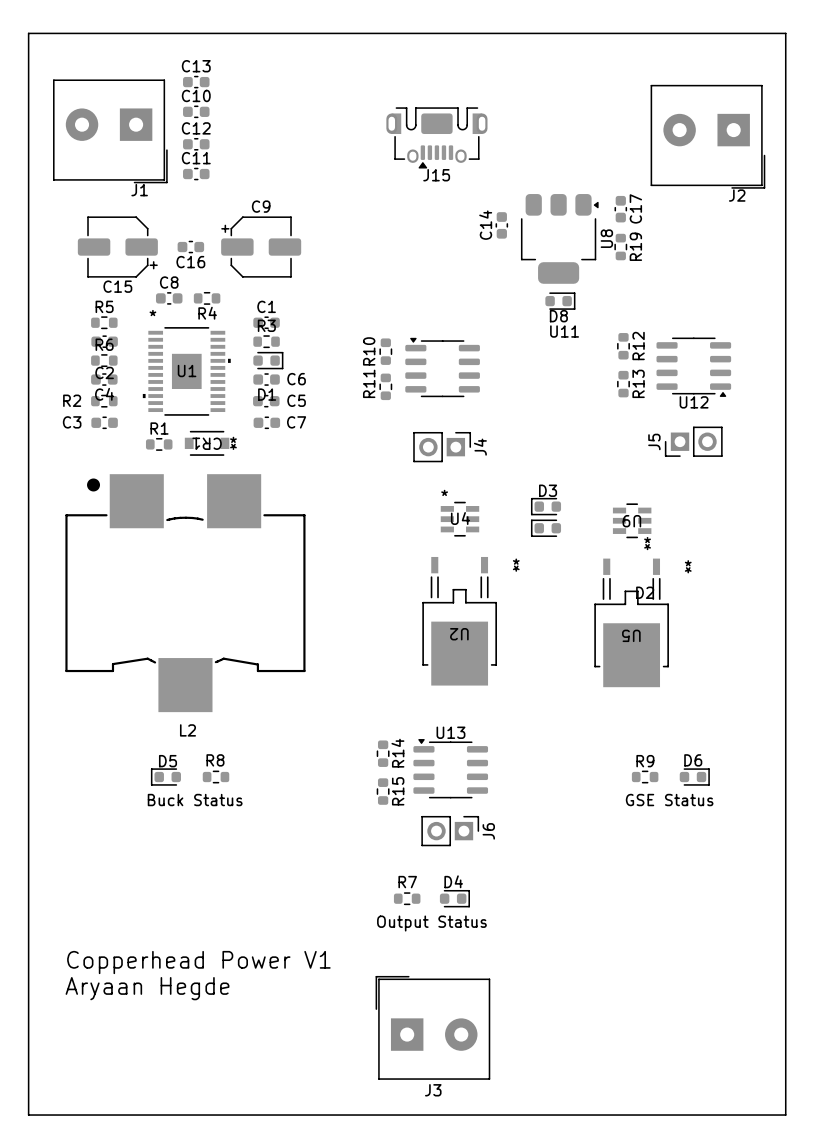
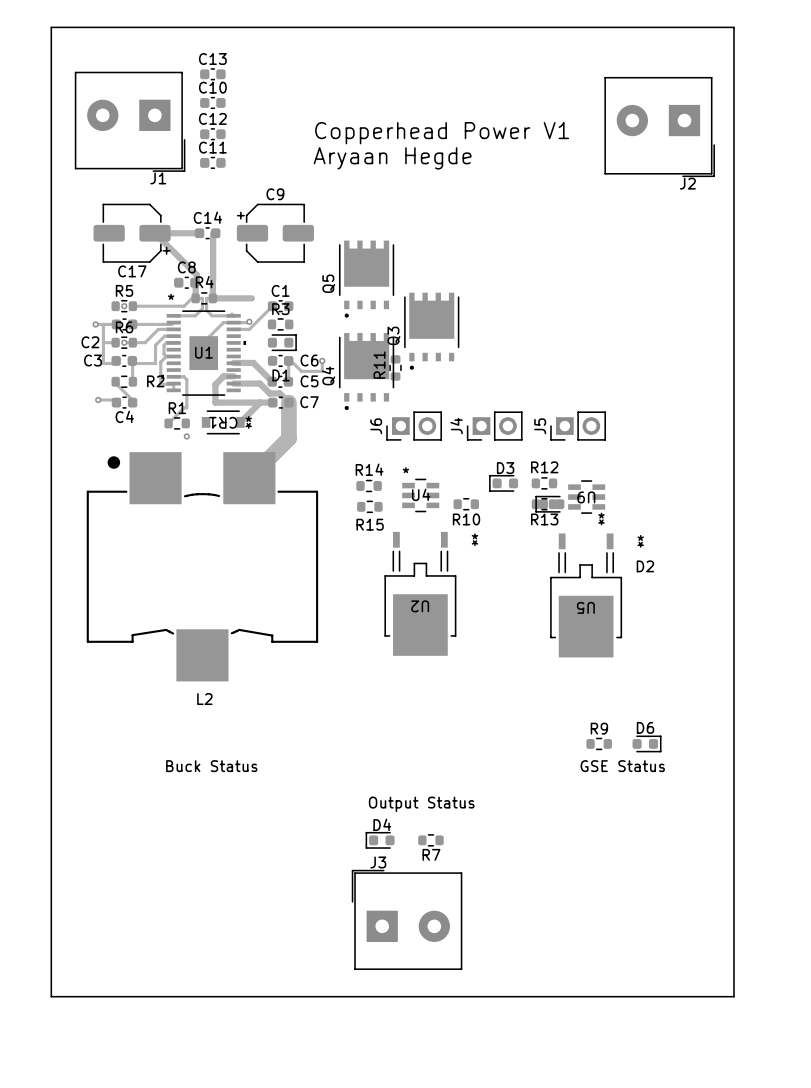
board edge: (737, 33) (785, 33) (785, 1115) (28, 1115) (28, 1039) -> (733, 27) (733, 996) (51, 996)
J2 position: (707, 136) -> (659, 127)
J15: (436, 138) -> none
text: none -> Copperhead Power V1 (442, 133)
text: none -> Aryaan Hegde (392, 158)
C17 footprint: [614, 195, 627, 223] -> [93, 203, 171, 263]
C17 name position: C17 (635, 208) -> C17 (132, 271)
C14: (501, 225) -> none
U8: (559, 238) -> none
C15: (117, 247) -> none
track: none -> (196, 233) (155, 233) (196, 275) (195, 298)
track: none -> (213, 233) (212, 298)
R19: (620, 247) -> none
C16 name: C16 (190, 262) -> C14 (207, 217)
Q5: none -> (366, 279)
R4 position: (207, 298) -> (204, 298)
D8: (560, 301) -> none
R4 name position: R4 (207, 313) -> R4 (204, 282)
track: none -> (212, 298) (206, 298) (206, 310) (212, 315) (233, 315) (231, 314)
track: none -> (212, 298) (251, 298)
via: none -> (124, 306)
track: none -> (132, 306) (184, 306) (192, 298) (202, 298) (202, 308) (195, 315) (173, 315)
track: none -> (272, 306) (249, 329) (233, 329)
track: none -> (249, 321) (223, 322) (203, 342) (203, 353)
via: none -> (249, 321)
track: none -> (173, 322) (171, 324) (132, 324)
track: none -> (95, 324) (116, 324)
via: none -> (95, 324)
track: none -> (103, 324) (103, 363) (116, 363)
track: none -> (173, 329) (158, 329) (145, 342) (124, 342)
R12 rotation: 0° (623, 346) -> 90° clockwise (544, 483)
R12 position: (623, 346) -> (544, 483)
R12 name position: R12 (638, 346) -> R12 (544, 467)
Q3: none -> (431, 331)
R10 name position: R10 (369, 351) -> R10 (466, 519)
R10 rotation: 0° (385, 351) -> 90° clockwise (466, 504)
R10 position: (385, 351) -> (466, 504)
track: none -> (173, 336) (164, 336) (155, 345) (155, 363) (132, 363) (132, 381)
track: none -> (103, 342) (115, 342)
via: none -> (124, 342)
track: none -> (173, 342) (166, 342) (164, 345) (164, 354) (166, 356)
U11: (442, 367) -> none
U12: (693, 367) -> none
C2 name position: C2 (104, 372) -> C2 (90, 342)
track: none -> (166, 356) (160, 362) (160, 384) (173, 383) (173, 390)
track: none -> (322, 360) (322, 371) (301, 371) (288, 360) (288, 381)
via: none -> (322, 360)
track: none -> (233, 362) (253, 362) (272, 381)
R13 rotation: 0° (623, 384) -> 90° clockwise (544, 504)
R13 position: (623, 384) -> (544, 504)
Q4: none -> (366, 371)
C4 name: C4 (104, 394) -> C3 (93, 360)
track: none -> (233, 376) (223, 376) (215, 384) (215, 402) (272, 402)
track: none -> (173, 376) (183, 376) (186, 379) (186, 407) (184, 407) (168, 423)
R2 name position: R2 (72, 400) -> R2 (155, 381)
track: none -> (115, 381) (132, 400)
track: none -> (233, 383) (259, 383) (269, 393) (279, 393) (288, 402) (288, 438) (249, 478)
track: none -> (98, 400) (116, 400)
via: none -> (98, 400)
C3 name: C3 (72, 422) -> C4 (124, 416)
track: none -> (260, 402) (240, 422)
J5 position: (693, 441) -> (578, 426)
J4 rotation: 0° (442, 447) -> 180° (494, 426)
J4 position: (442, 447) -> (494, 426)
via: none -> (186, 436)
D3 position: (546, 506) -> (503, 483)
U4 position: (459, 519) -> (420, 495)
U9 position: (632, 520) -> (586, 497)
U2 position: (459, 621) -> (420, 593)
U5 position: (631, 622) -> (586, 595)
R14 rotation: 0° (383, 753) -> 90° clockwise (369, 485)
R14 position: (383, 753) -> (369, 485)
R14 name position: R14 (397, 753) -> R14 (369, 469)
U13: (450, 768) -> none
D5: (166, 777) -> none
R8: (216, 777) -> none
R9 position: (645, 777) -> (599, 743)
D6 position: (694, 777) -> (646, 743)
R15 rotation: 0° (383, 791) -> 90° clockwise (369, 506)
R15 position: (383, 791) -> (369, 506)
text position: GSE Status (669, 800) -> GSE Status (622, 766)
J6 rotation: 0° (450, 831) -> 180° (414, 426)
J6 position: (450, 831) -> (414, 426)
R7 name position: R7 (407, 882) -> R7 (431, 854)
R7 position: (407, 898) -> (430, 840)
D4 rotation: 0° (454, 898) -> 180° (380, 840)
D4 position: (454, 898) -> (380, 840)
text position: Output Status (431, 923) -> Output Status (421, 804)
text: Copperhead Power V1 (198, 962) -> none
text: Aryaan Hegde (147, 988) -> none
J3 position: (432, 1027) -> (407, 919)
J3 name position: J3 (433, 1090) -> J3 (378, 862)

